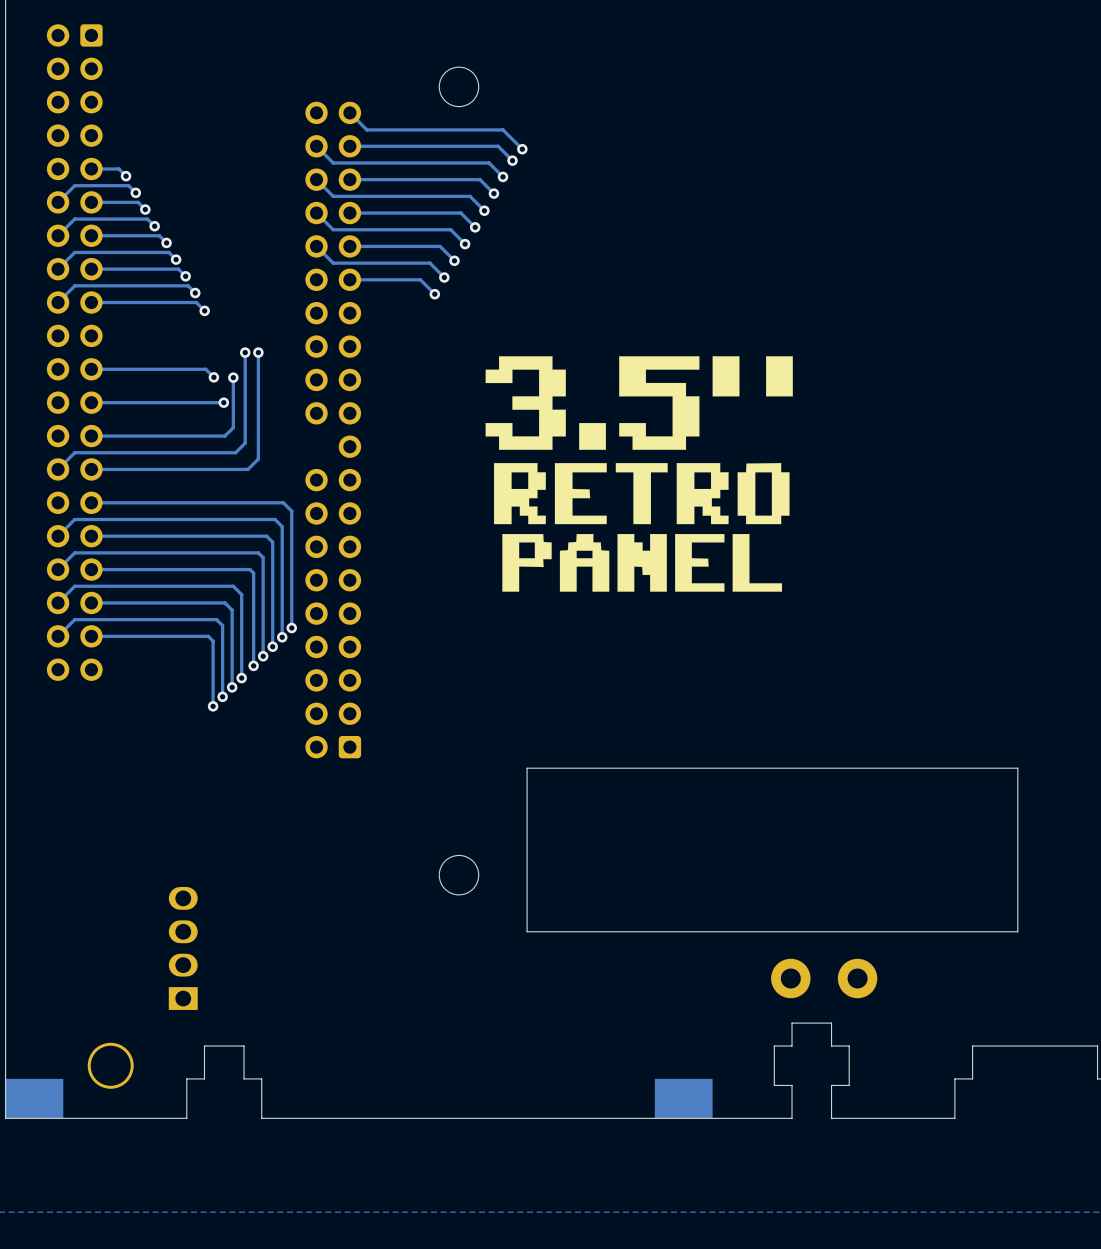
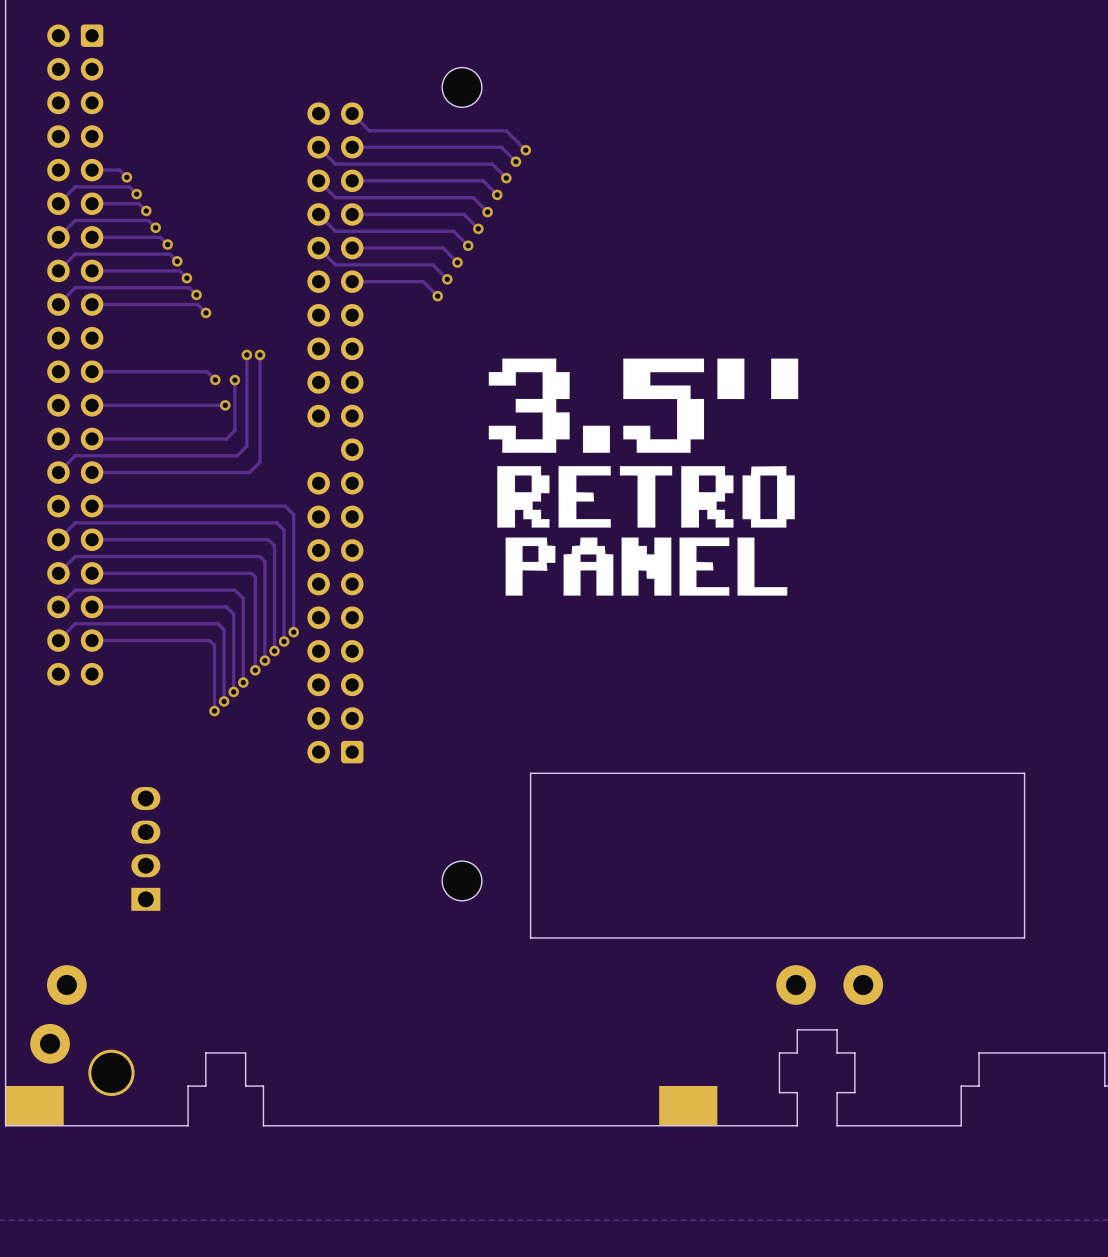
part position: (183, 948) -> (145, 848)
part: none -> (66, 985)
part: none -> (50, 1043)

